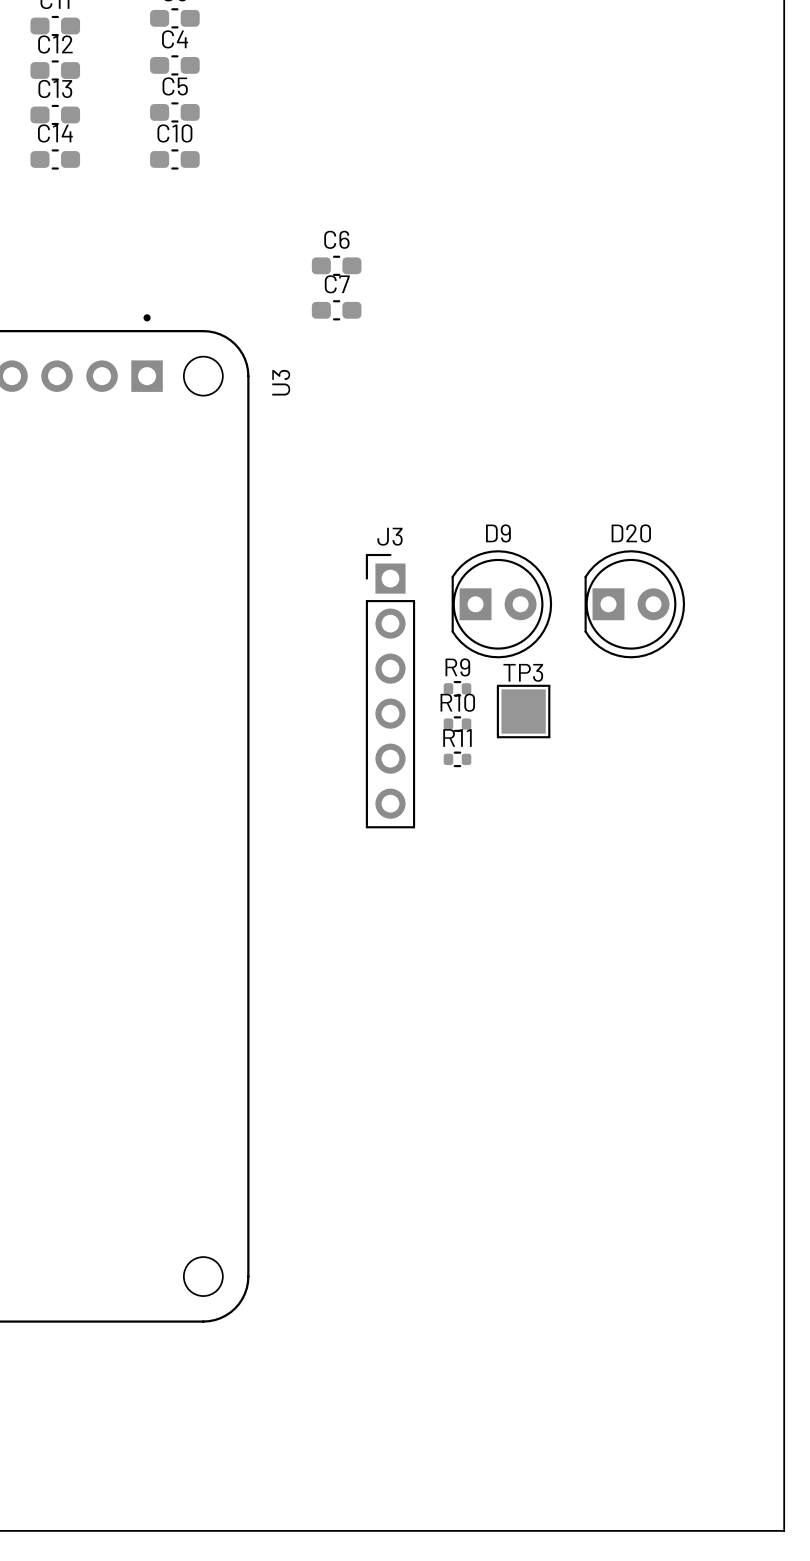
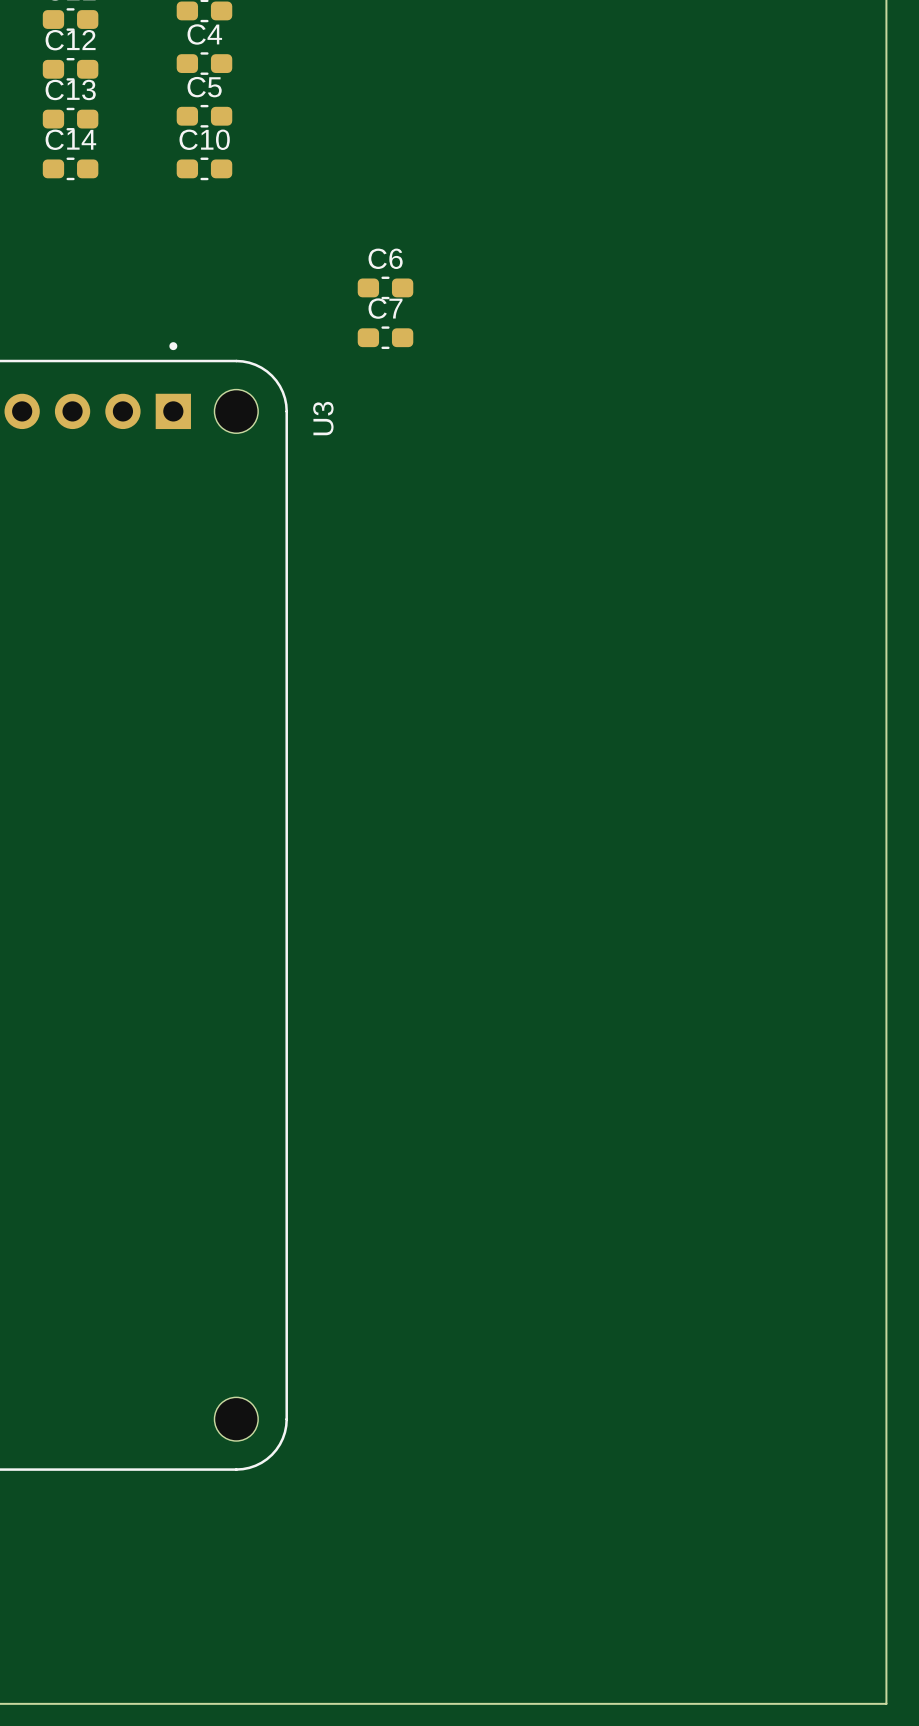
D9: (501, 604) -> none
D20: (634, 604) -> none
R9: (457, 688) -> none
J3: (390, 691) -> none
TP3: (523, 711) -> none
R10: (457, 724) -> none
R11: (457, 759) -> none

